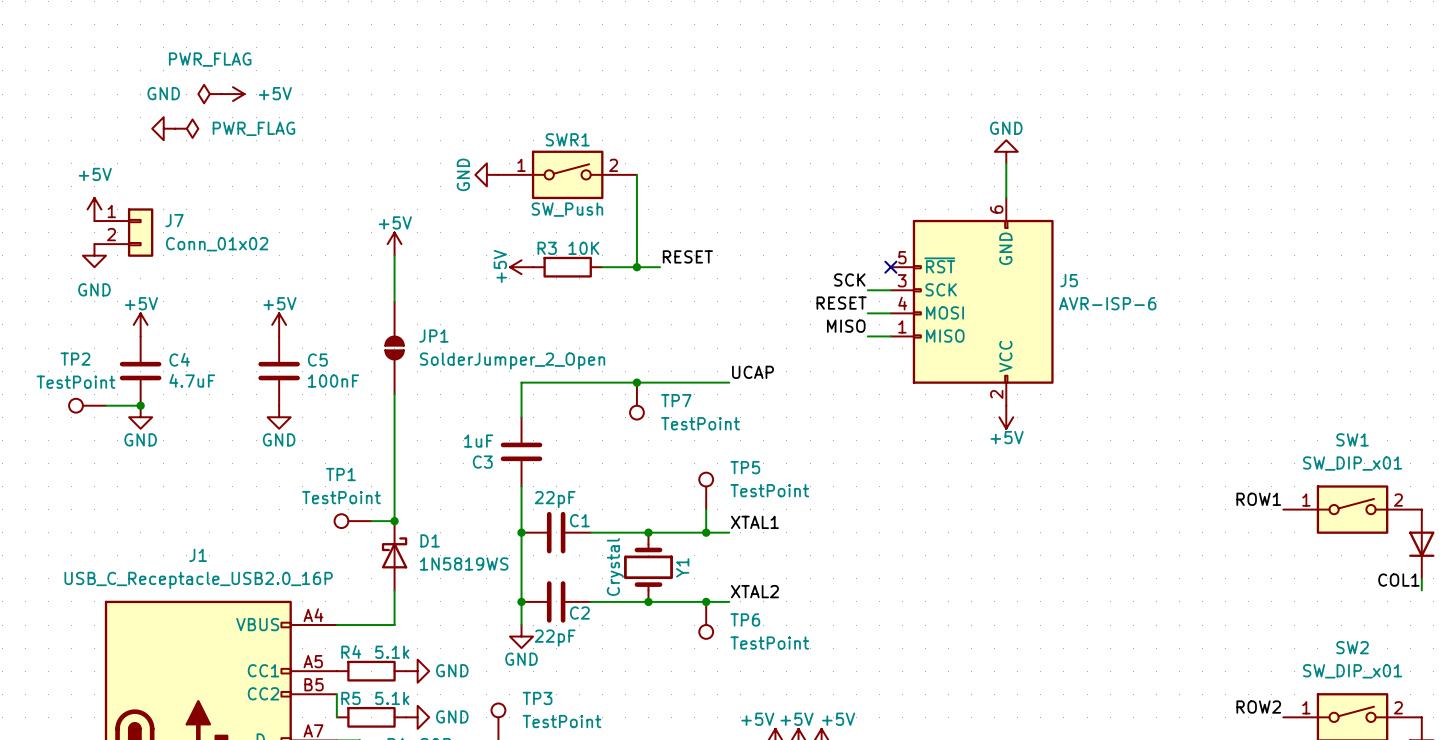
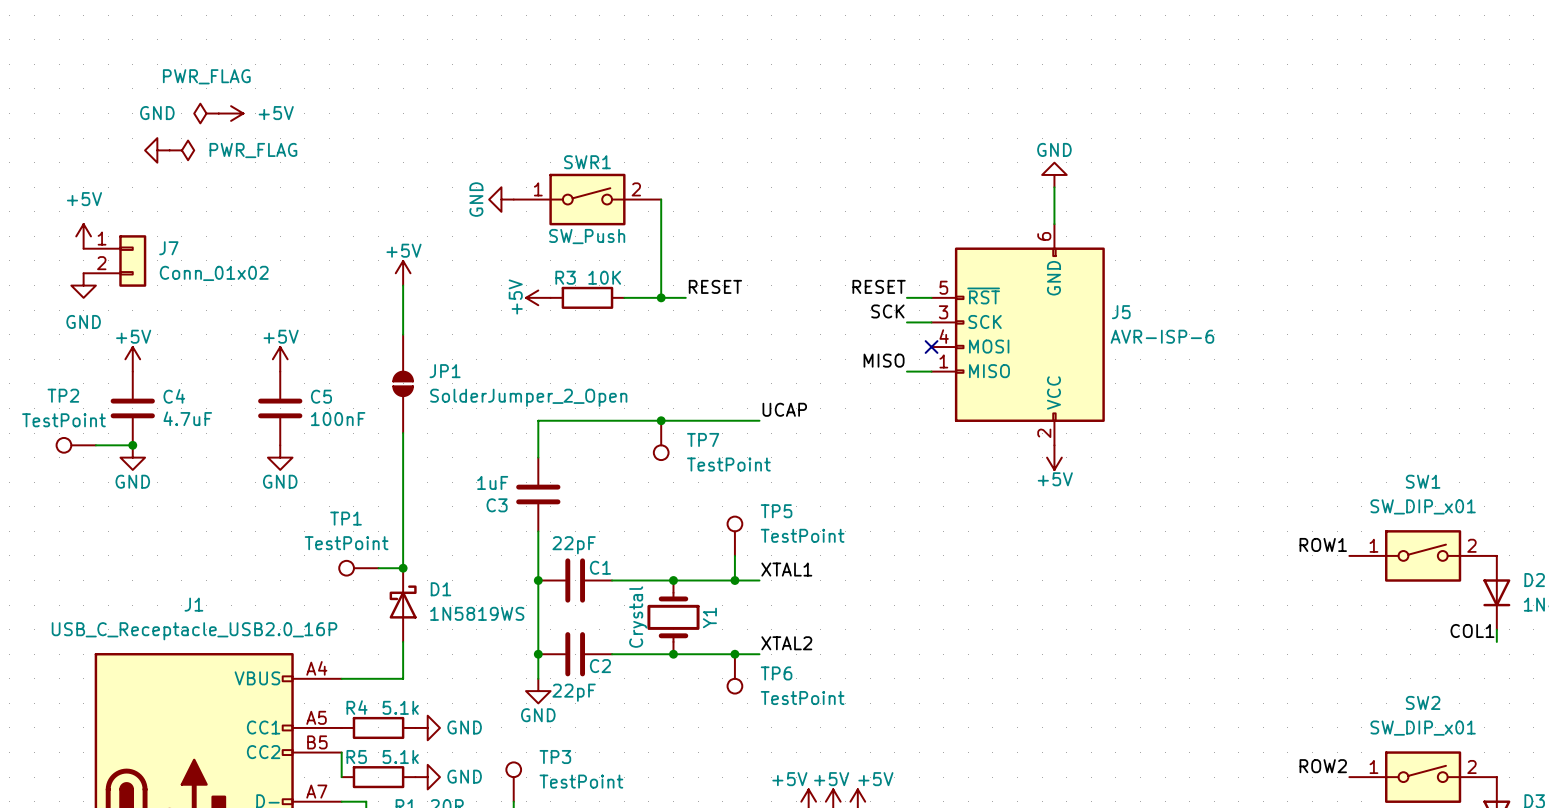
no-connect mark position: (890, 267) -> (931, 347)
label position: RESET (841, 303) -> RESET (879, 286)
wire: (867, 313) (890, 313) -> (906, 297) (931, 297)

